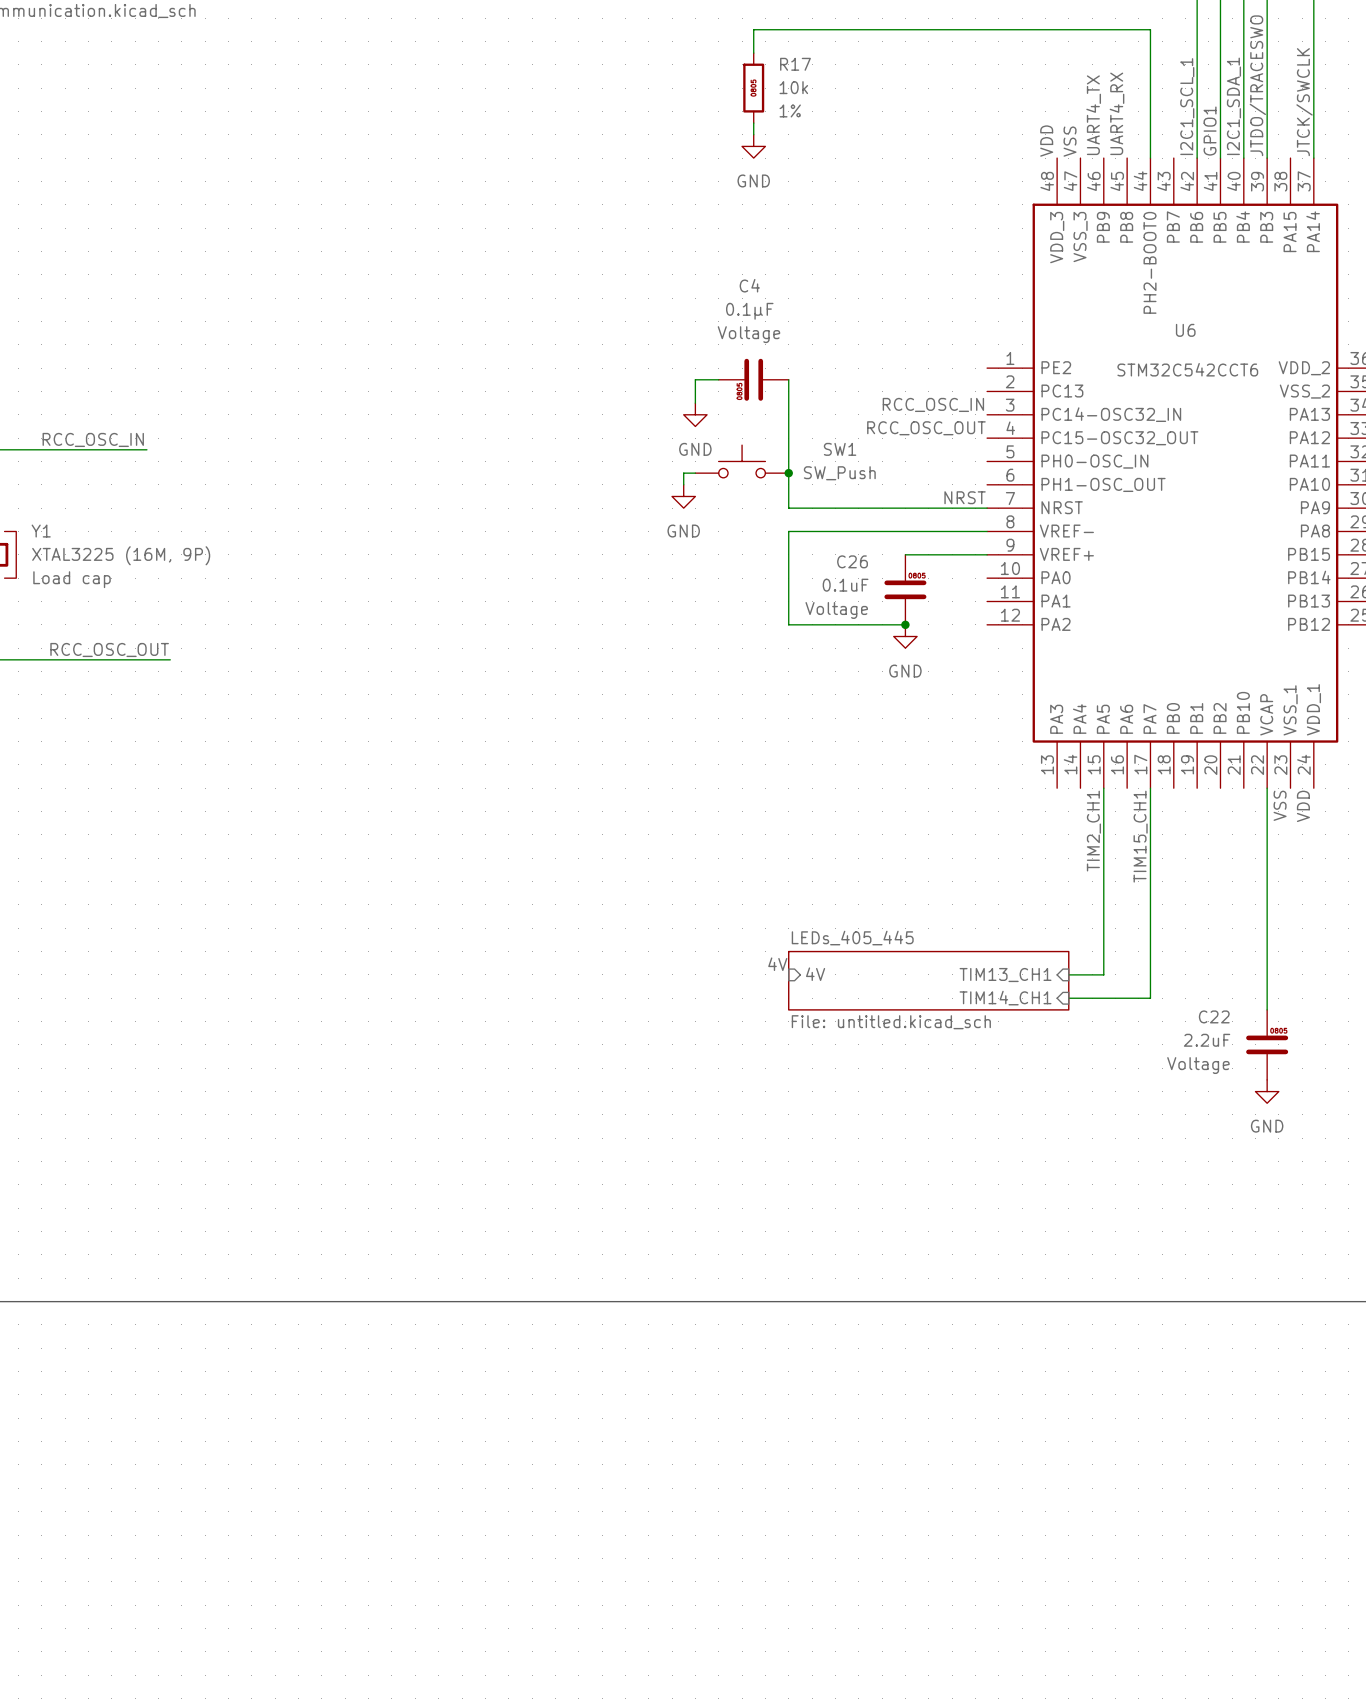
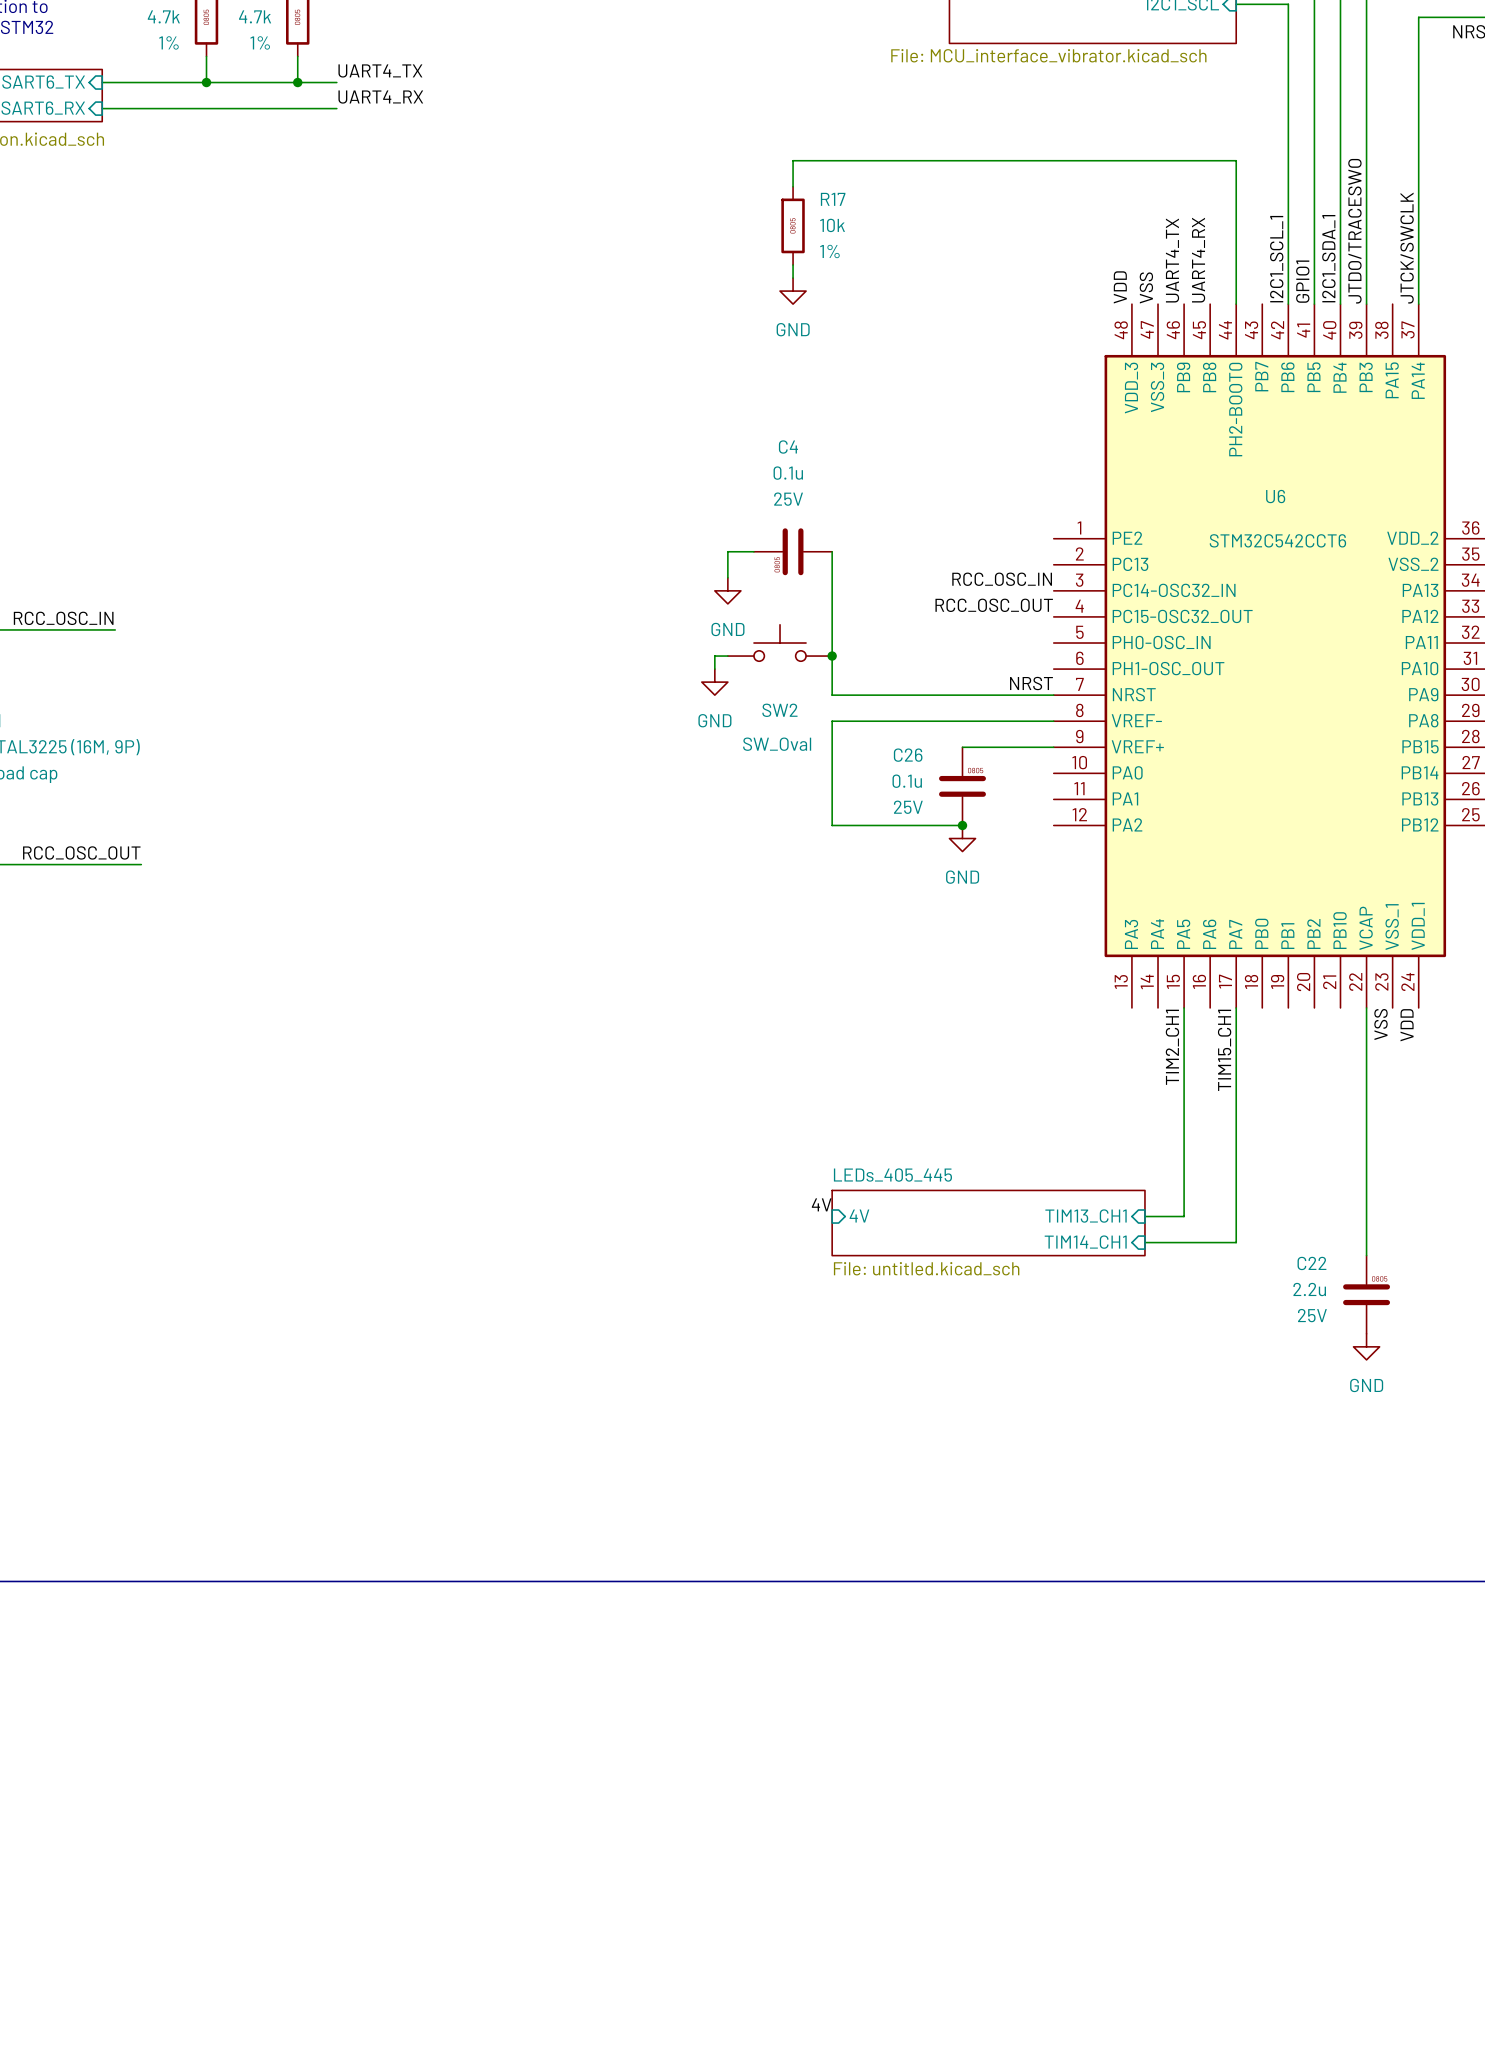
C4 value: 0.1μF (749, 311) -> 0.1u (788, 473)
C4 text: Voltage (748, 334) -> 25V (788, 499)
SW1 name: SW1 (840, 449) -> SW2 (779, 710)
SW1 value: SW_Push (839, 473) -> SW_Oval (777, 744)
C26 value: 0.1uF (845, 585) -> 0.1u (907, 781)
C26 text: Voltage (836, 610) -> 25V (908, 807)
C22 value: 2.2uF (1207, 1040) -> 2.2u (1309, 1289)
C22 text: Voltage (1198, 1065) -> 25V (1312, 1315)

